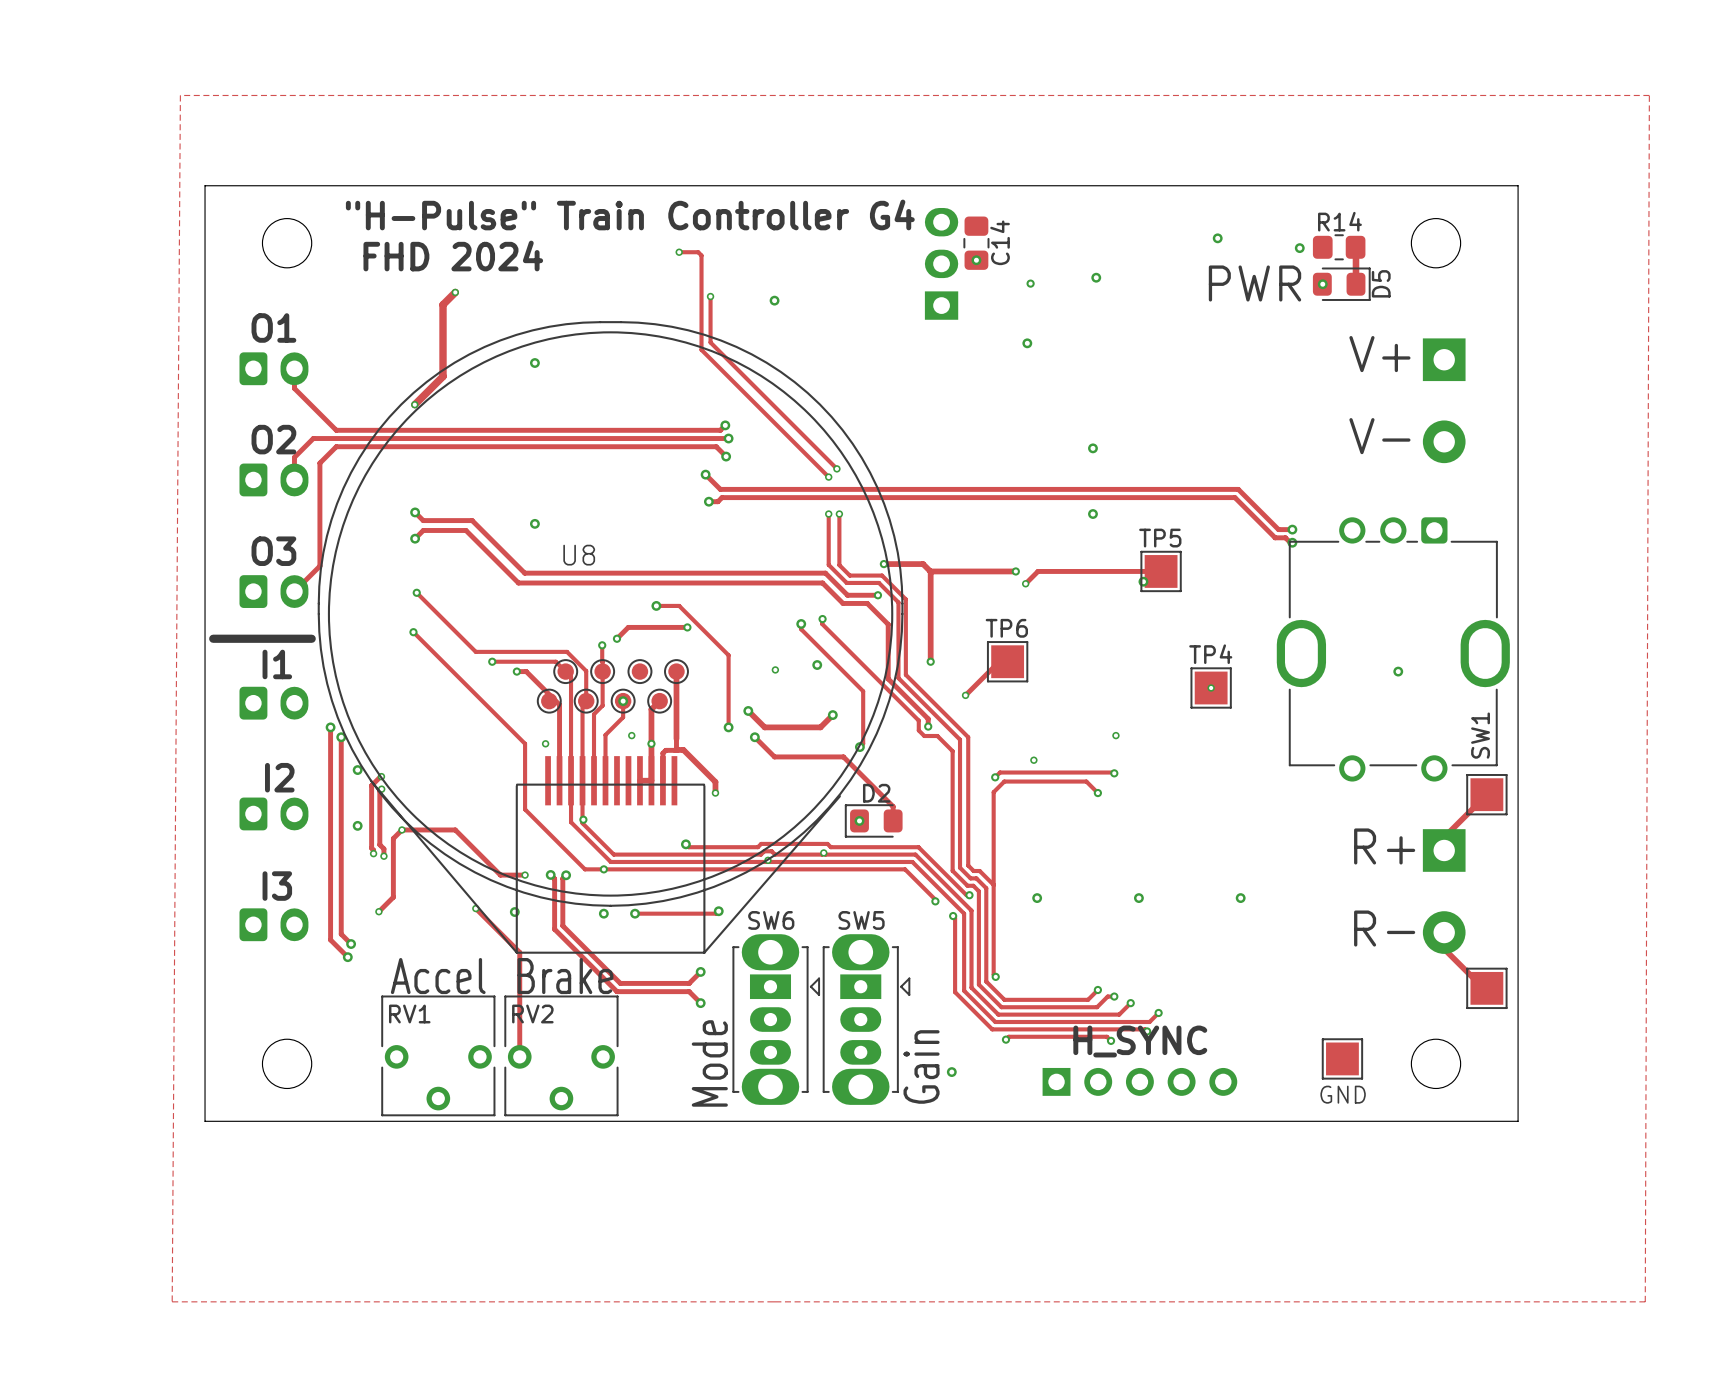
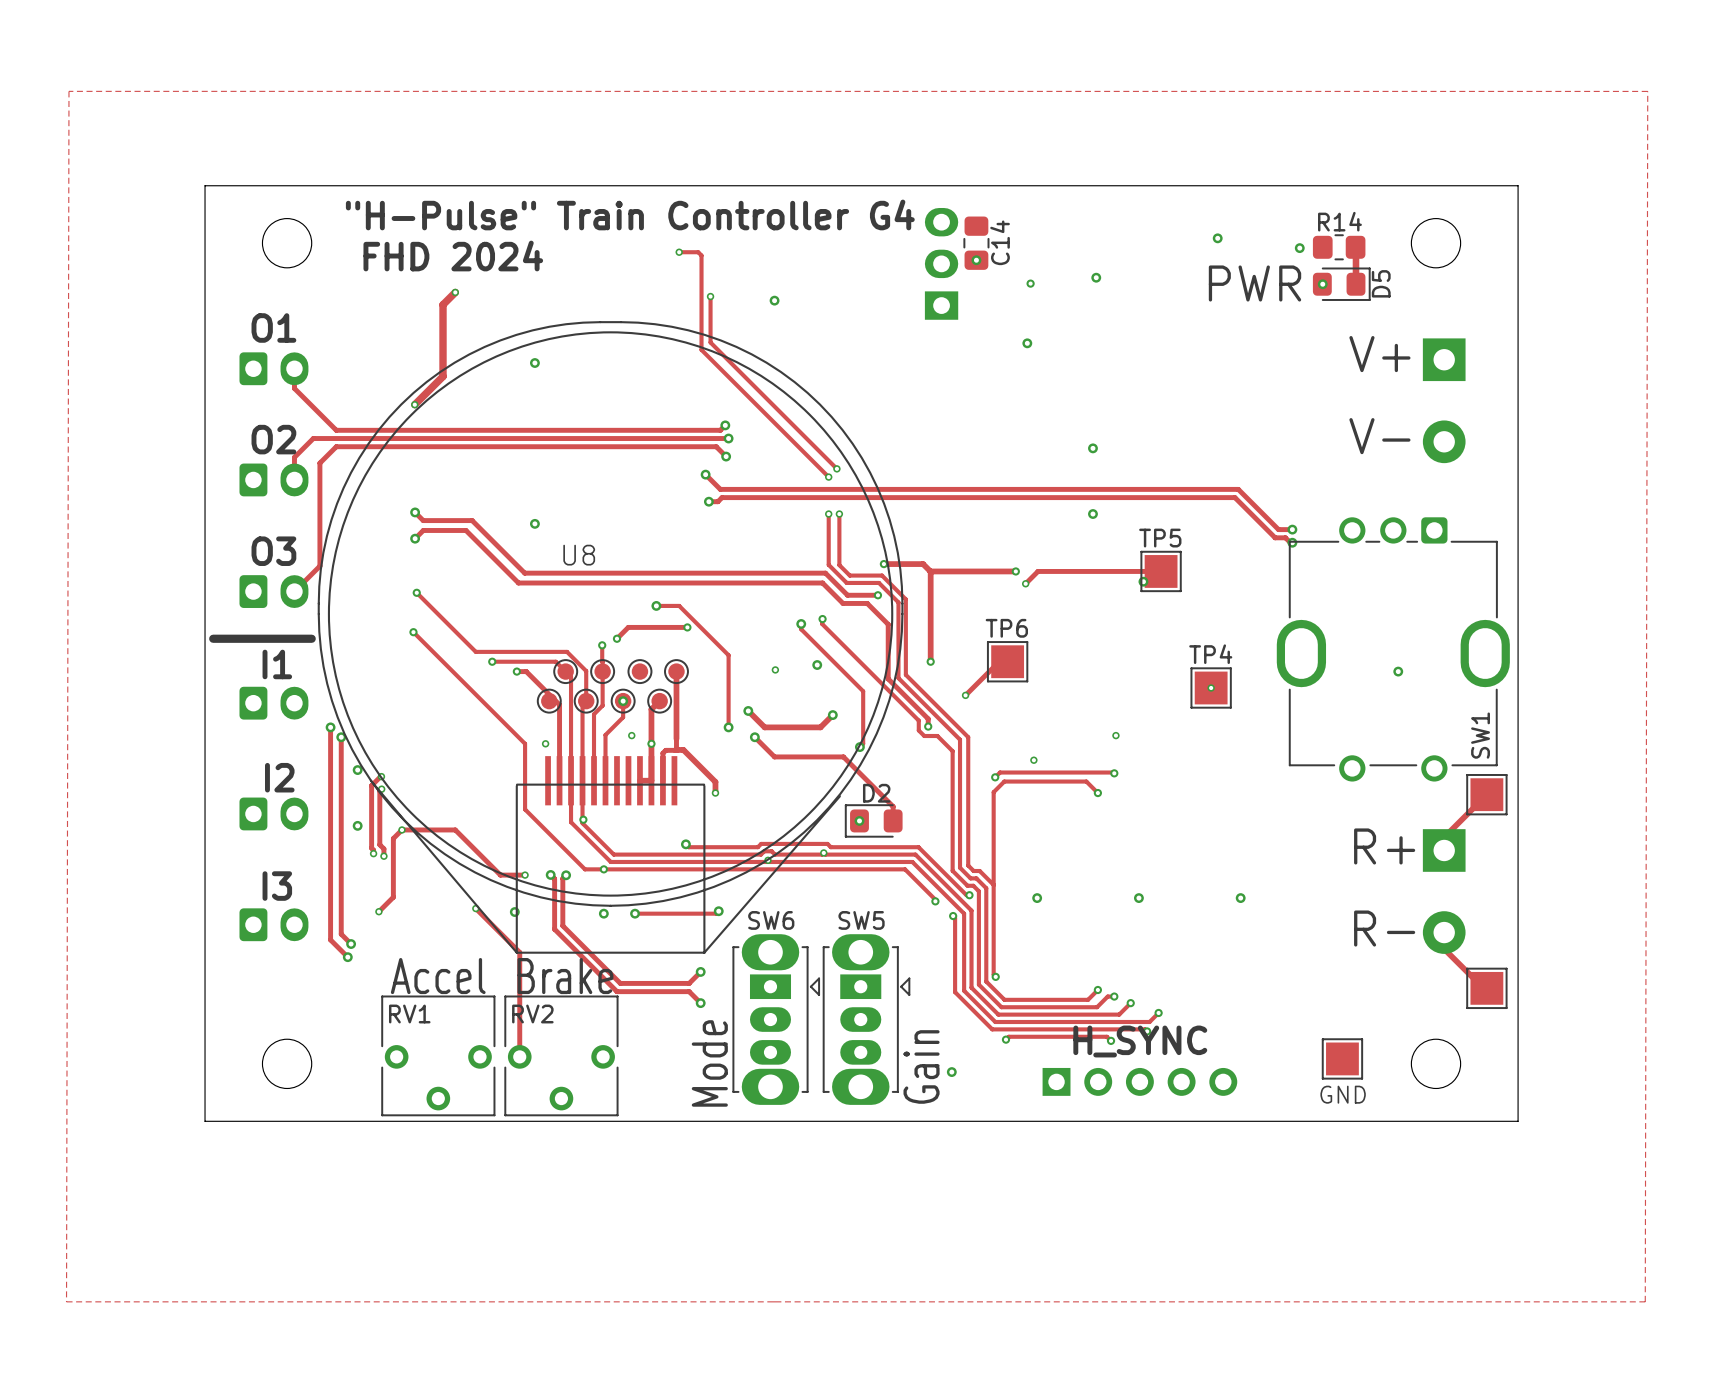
zone outline: (172, 1301) (180, 95) (1649, 95) (1645, 1301) -> (172, 1301) (66, 1301) (68, 91) (1647, 91) (1645, 1301)

